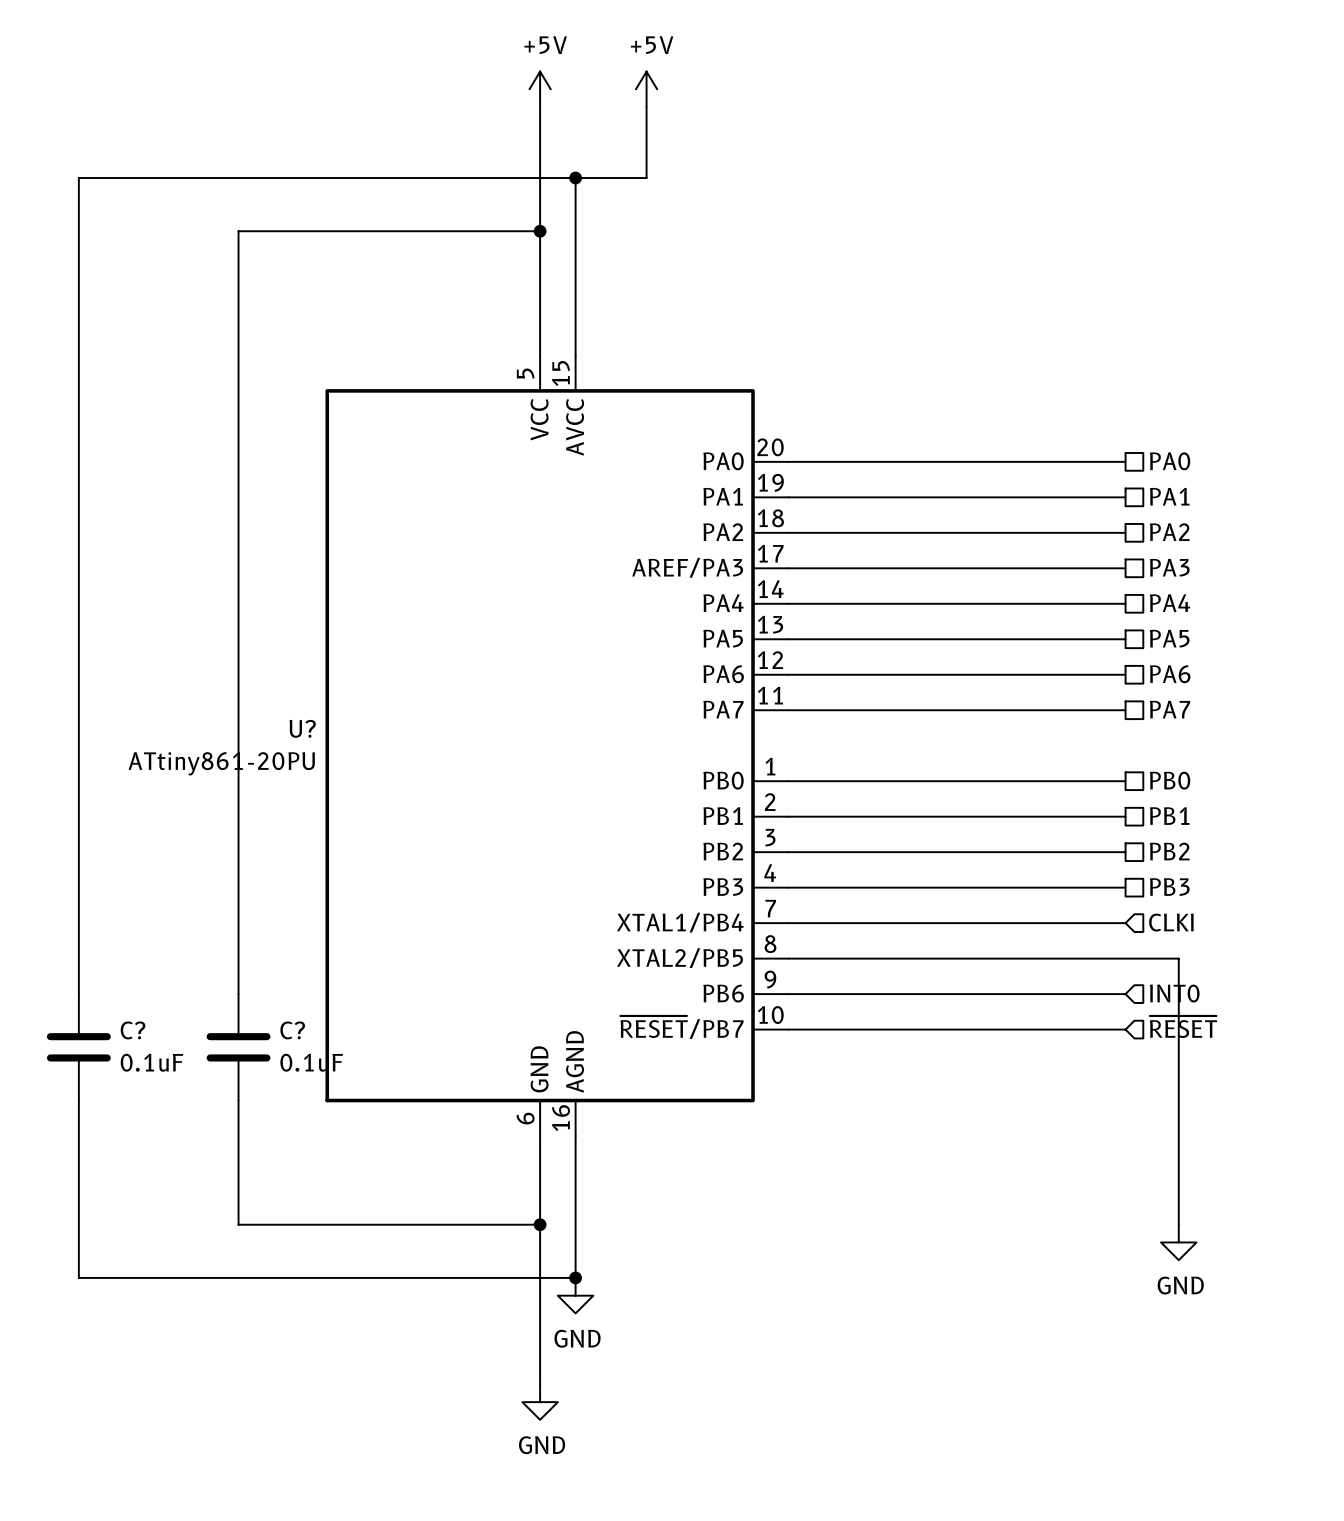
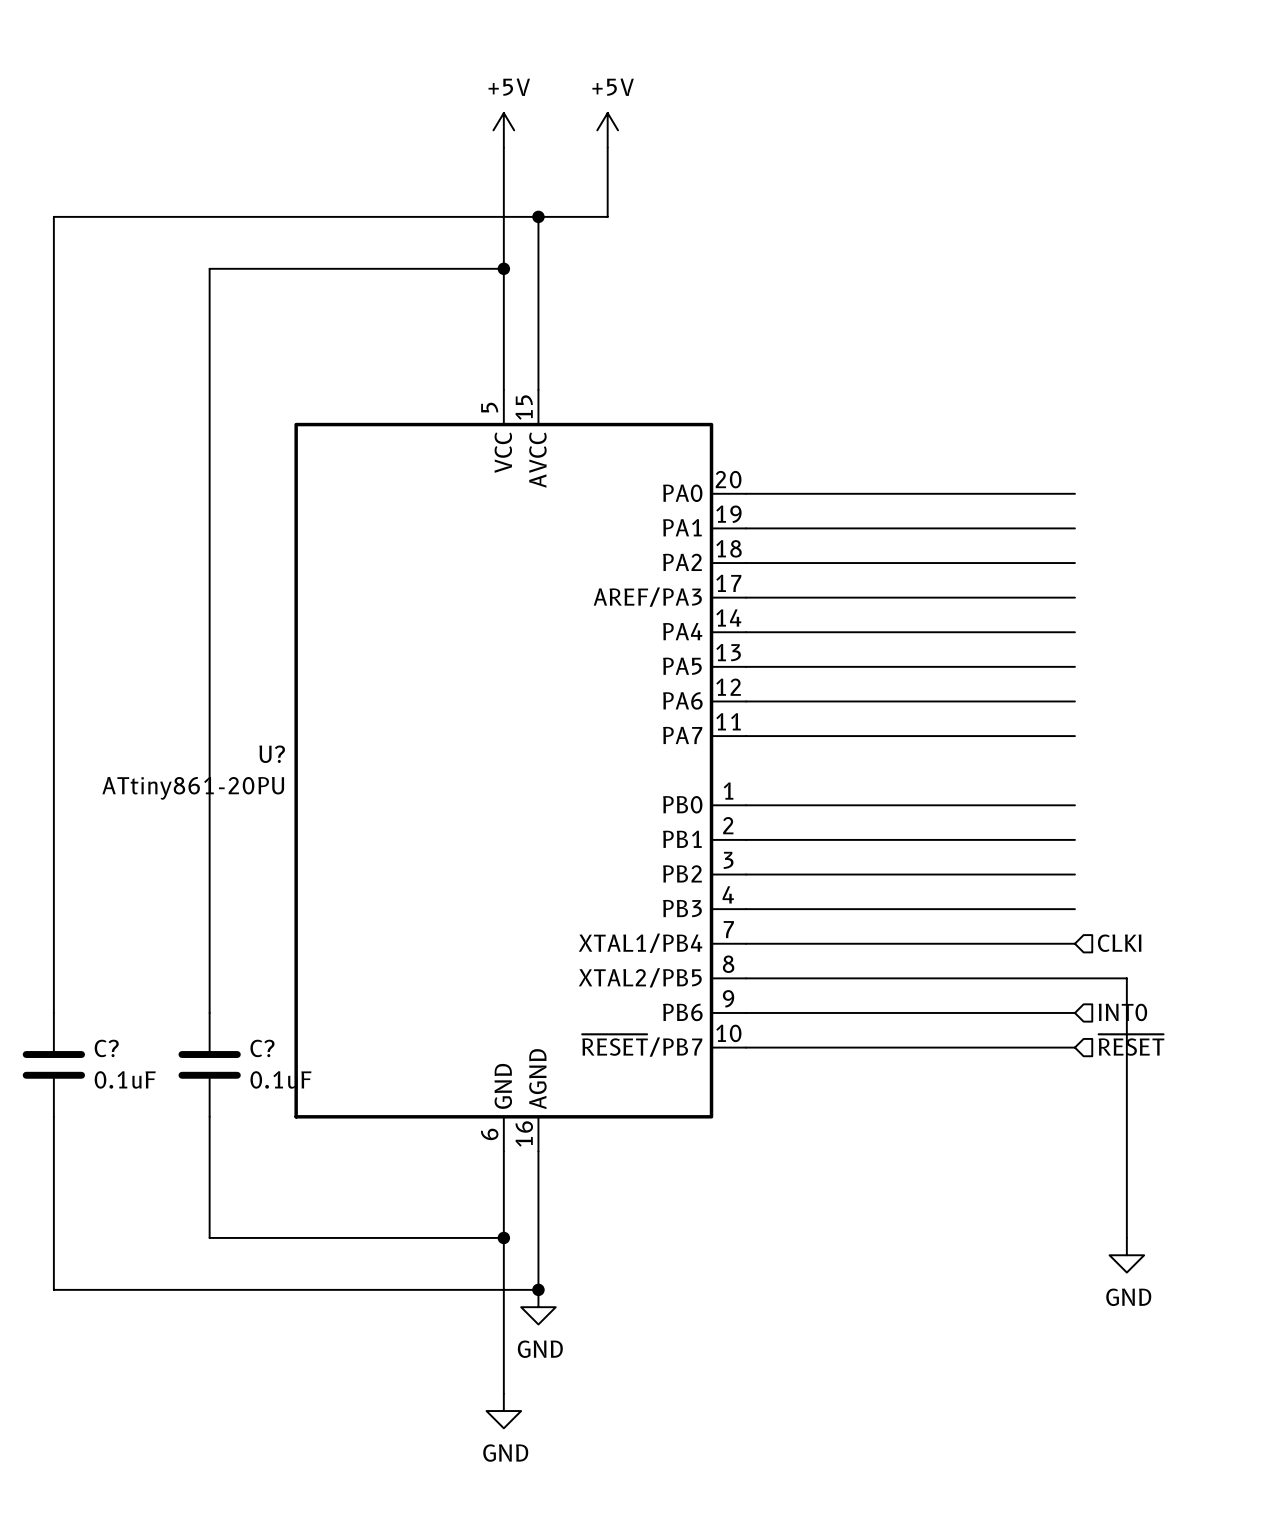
hierarchical label: PA0 (1170, 461) -> none
hierarchical label: PA1 (1169, 496) -> none
hierarchical label: PA2 (1169, 532) -> none
hierarchical label: PA3 (1169, 567) -> none
hierarchical label: PA4 (1170, 603) -> none
hierarchical label: PA5 (1169, 638) -> none
hierarchical label: PA6 (1170, 674) -> none
hierarchical label: PA7 (1170, 709) -> none
hierarchical label: PB0 (1170, 780) -> none
hierarchical label: PB1 (1169, 816) -> none
hierarchical label: PB2 (1169, 851) -> none
hierarchical label: PB3 (1169, 887) -> none

